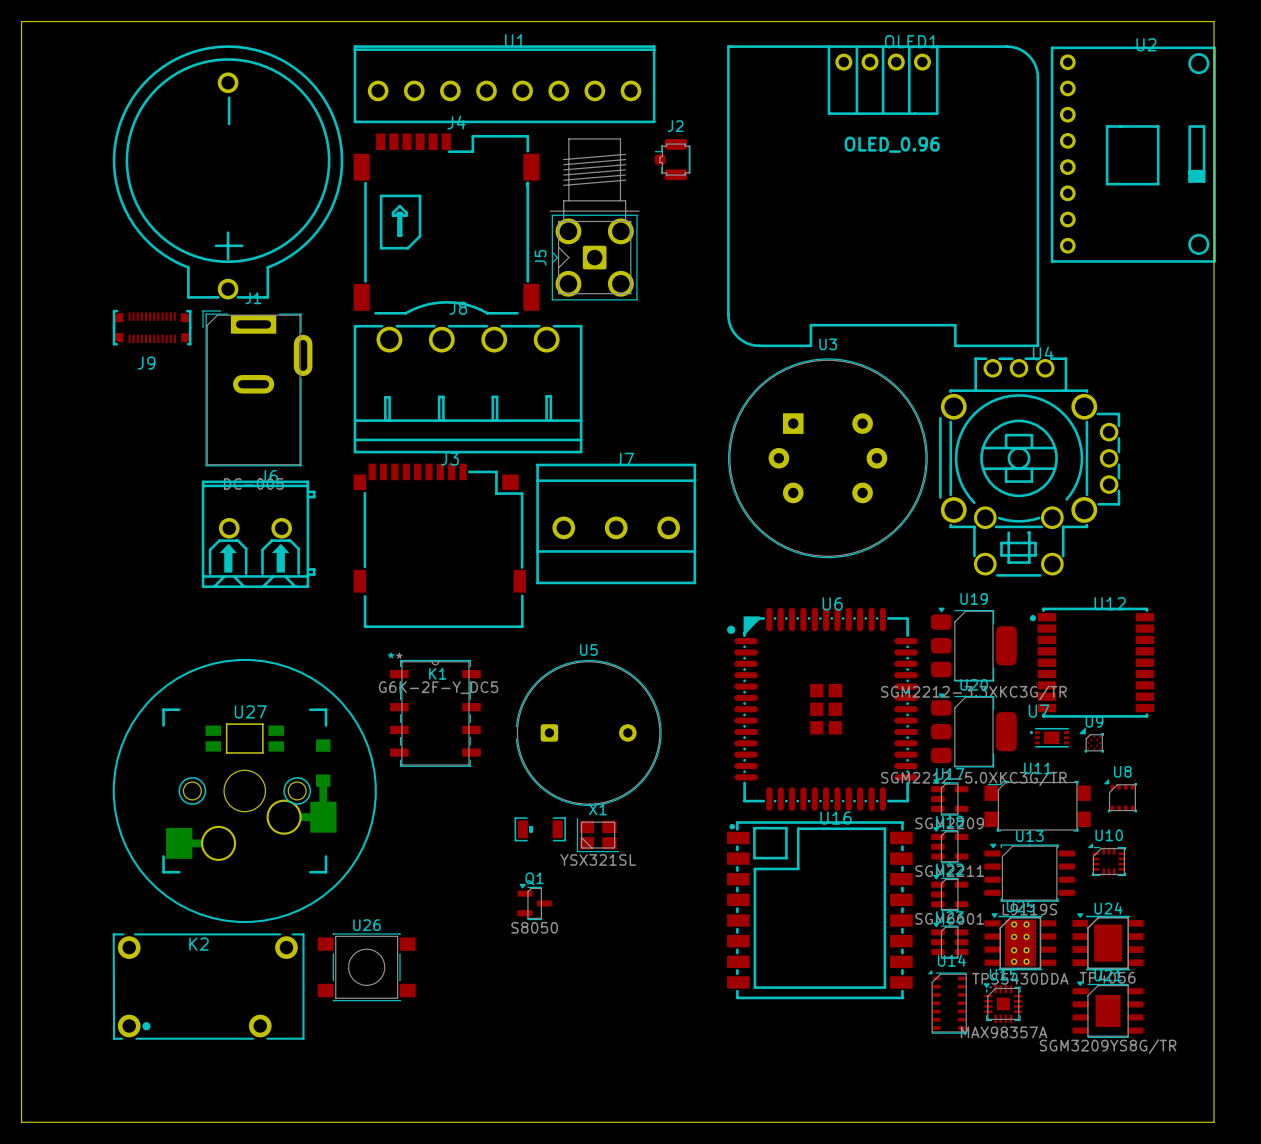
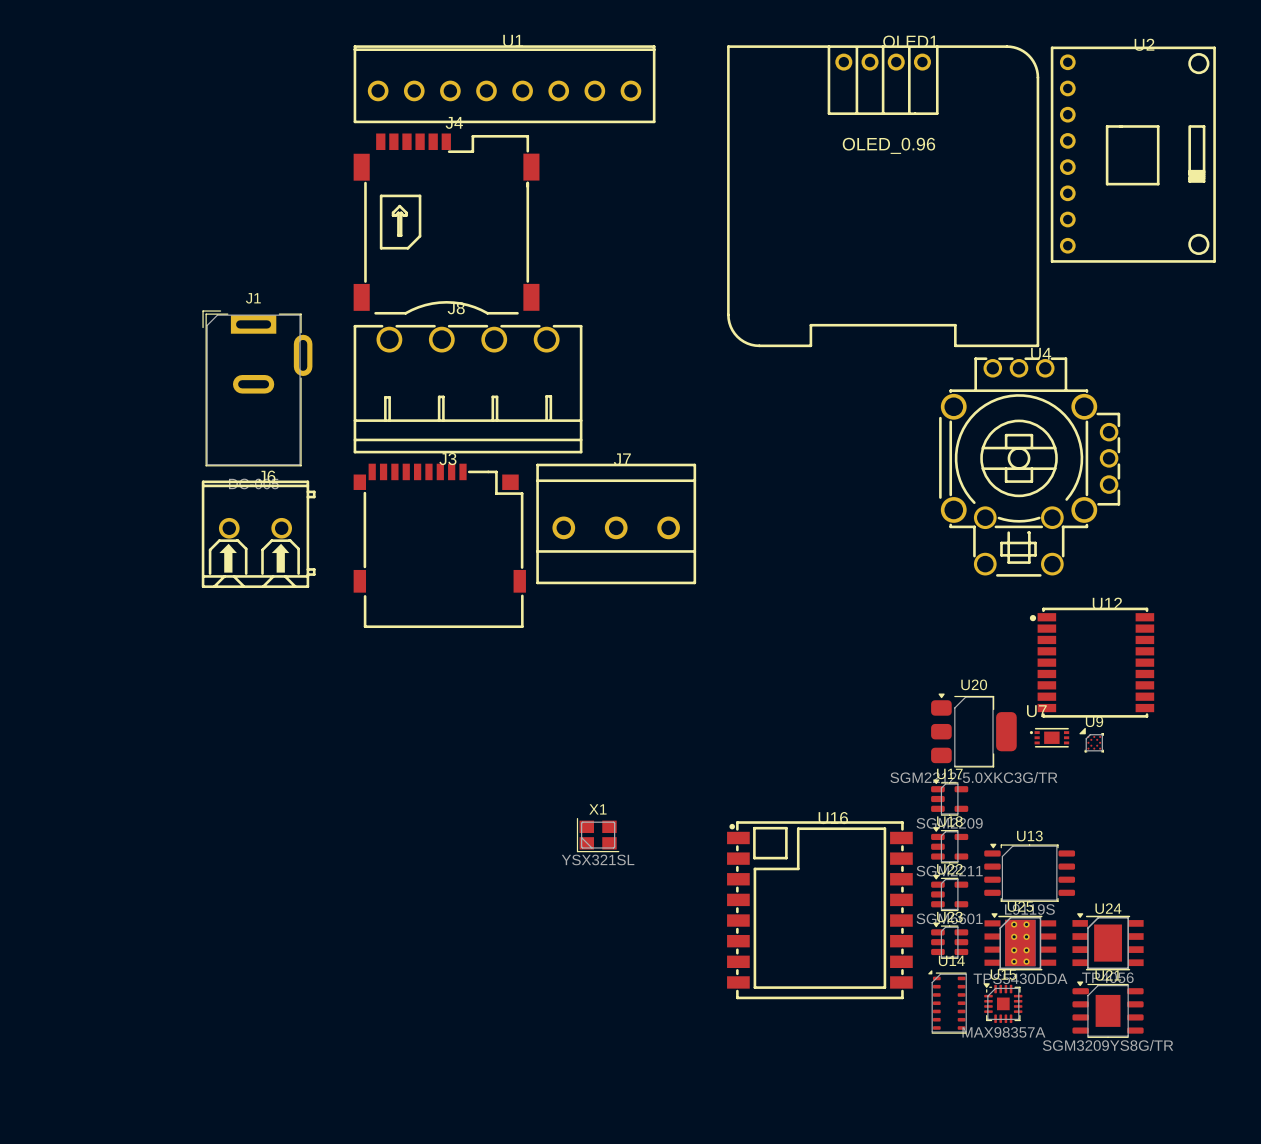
board edge: (21, 21) (1214, 21) (1214, 1122) (21, 1122) (21, 21) -> none
J2: (672, 159) -> none
part: (228, 172) -> none
J5: (594, 219) -> none
J9: (152, 327) -> none
U3: (827, 458) -> none
U19: SGM2212-3.3XKC3G/TR (973, 644) -> none
U6: (822, 709) -> none
K1: G6K-2F-Y_DC5 (435, 713) -> none
U5: (588, 732) -> none
U27: (244, 790) -> none
U8: (1120, 795) -> none
U11: (1037, 806) -> none
part: (540, 829) -> none
U10: (1107, 859) -> none
Q1: S8050 (534, 901) -> none
U26: (366, 967) -> none
K2: (208, 986) -> none

